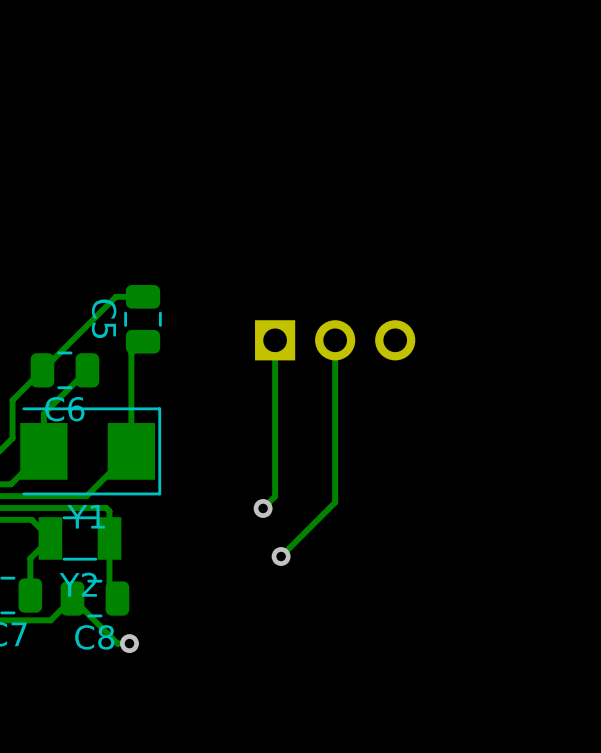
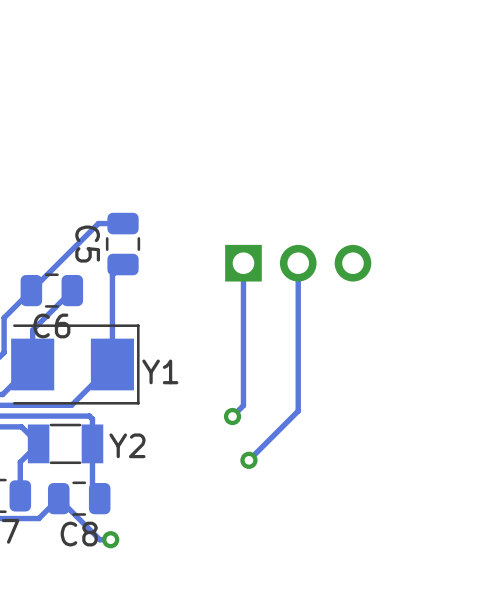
Y1 name position: Y1 (86, 516) -> Y1 (160, 371)
Y2 name position: Y2 (78, 584) -> Y2 (127, 445)

